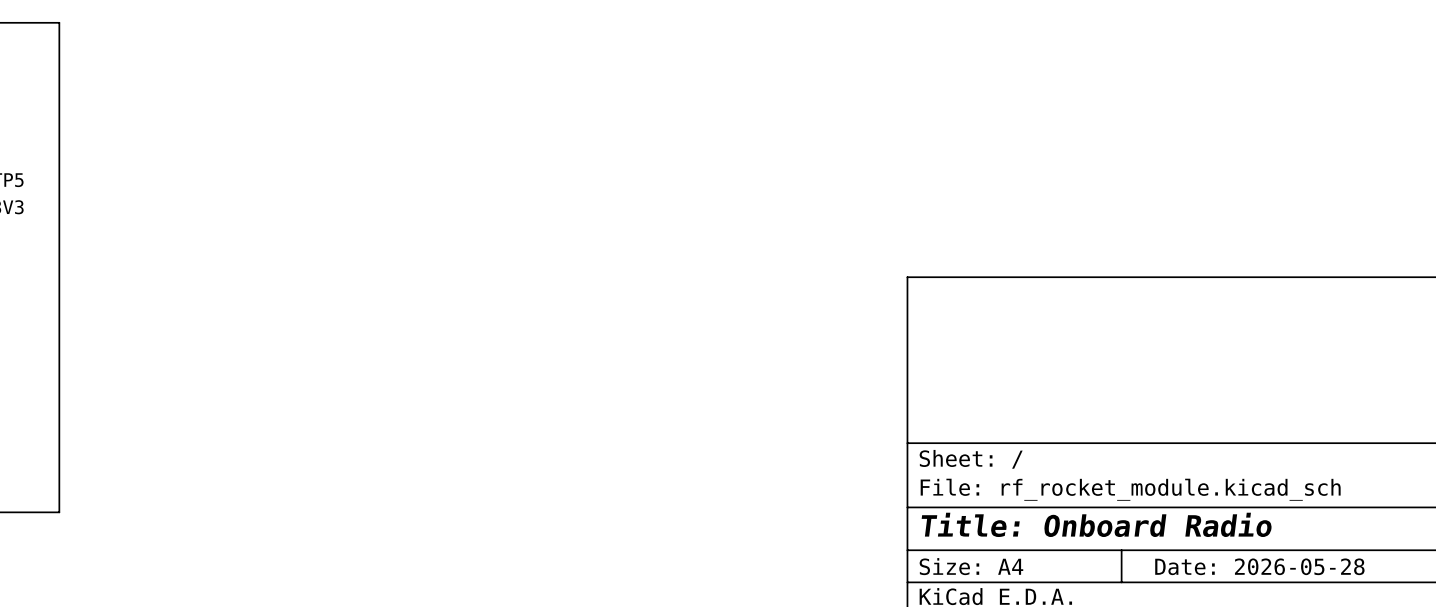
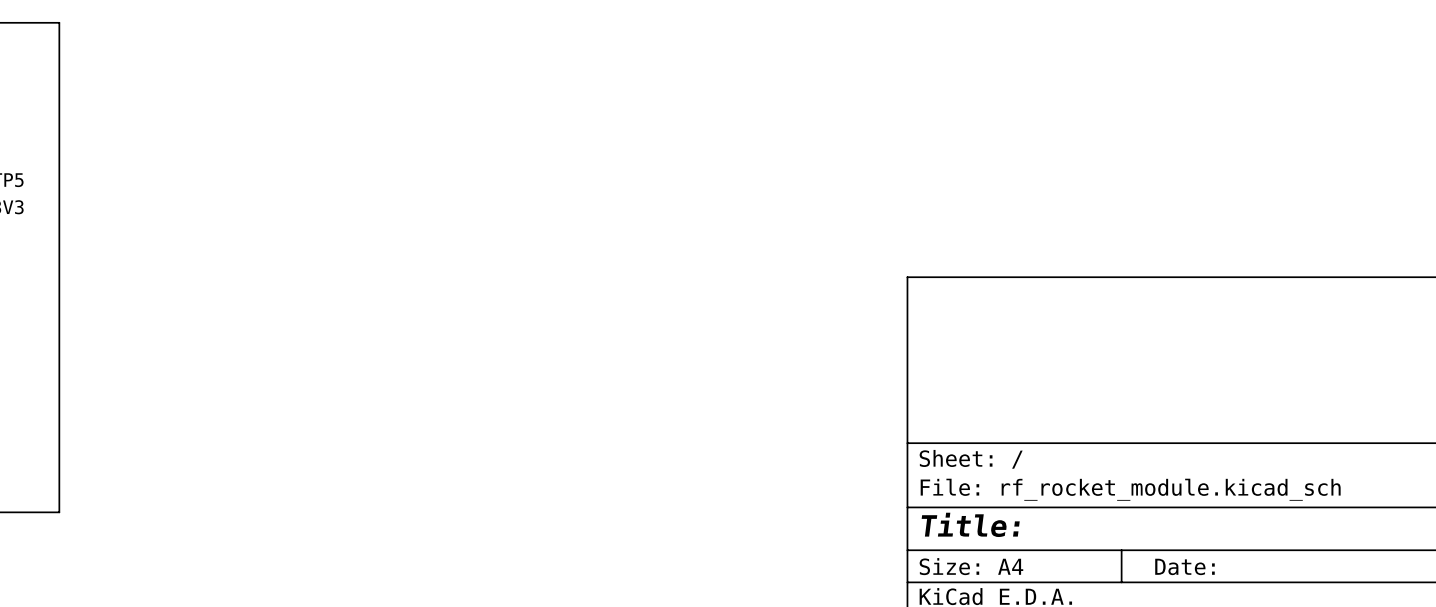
title block: Title: Onboard Radio (1096, 524) -> Title: (970, 524)
title block: Date: 2026-05-28 (1259, 566) -> Date: (1184, 566)

